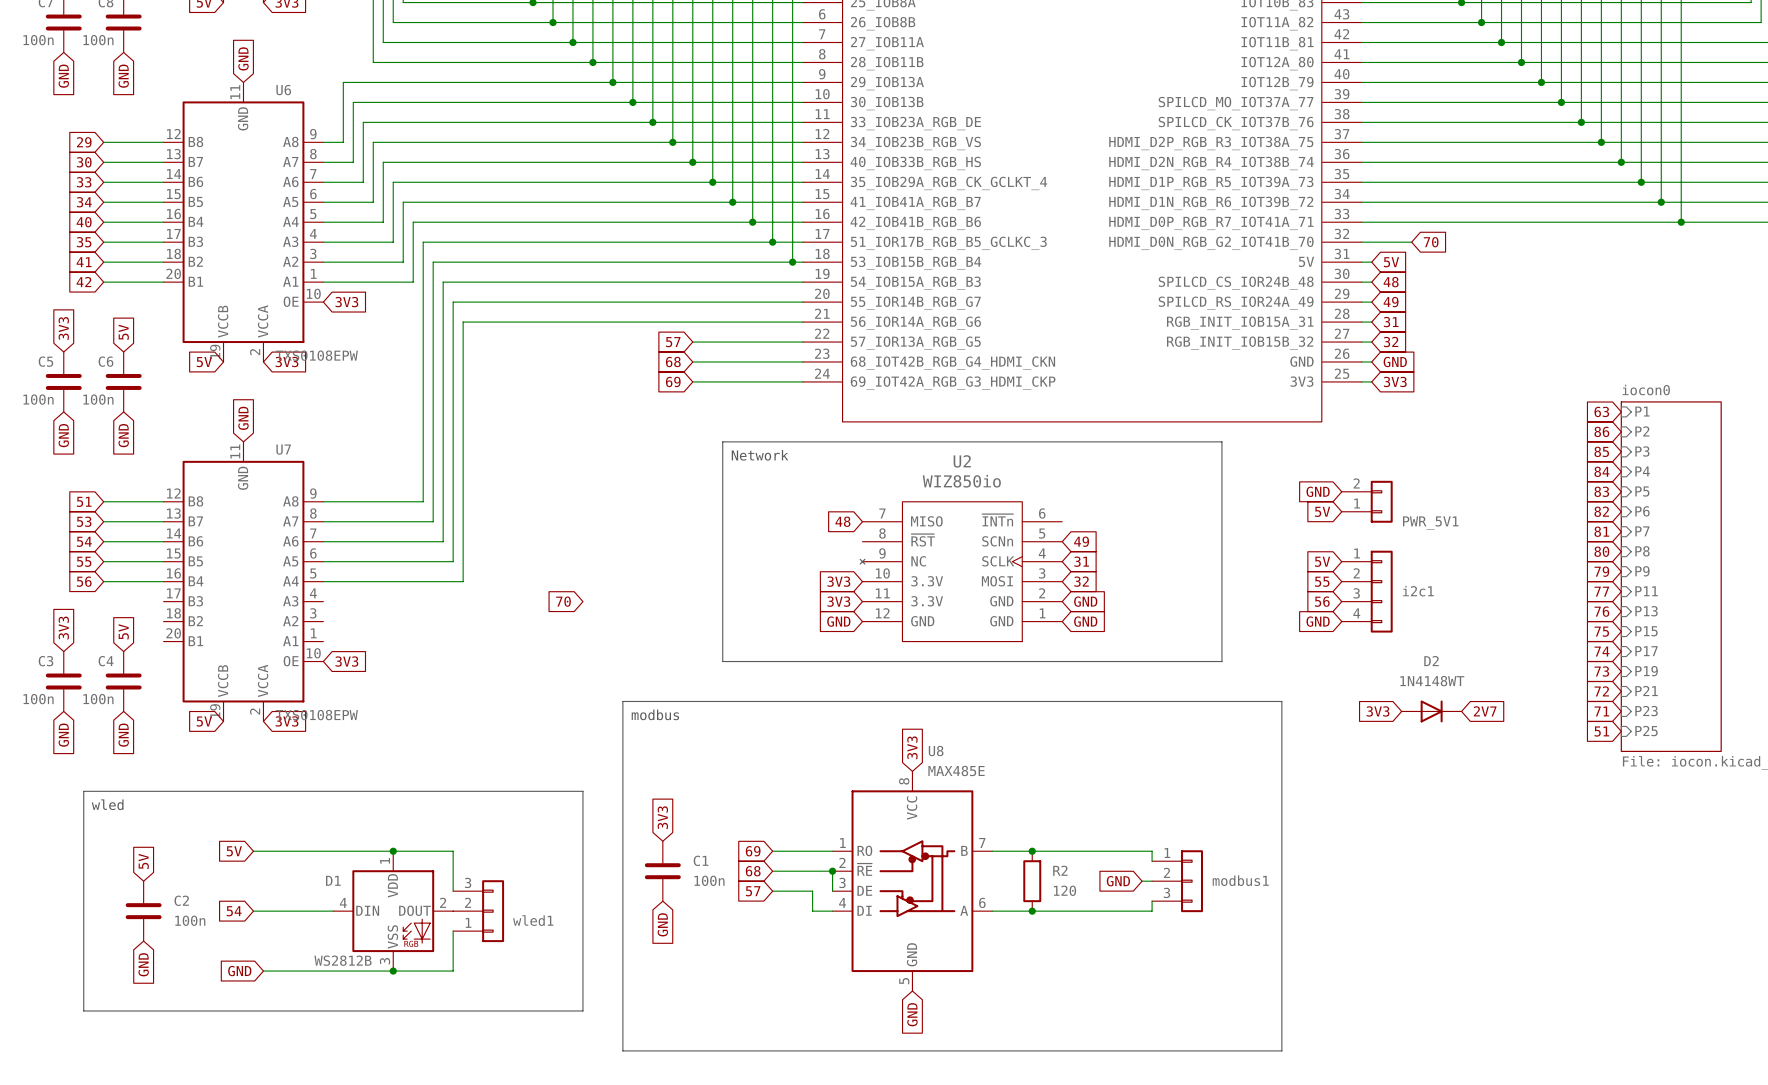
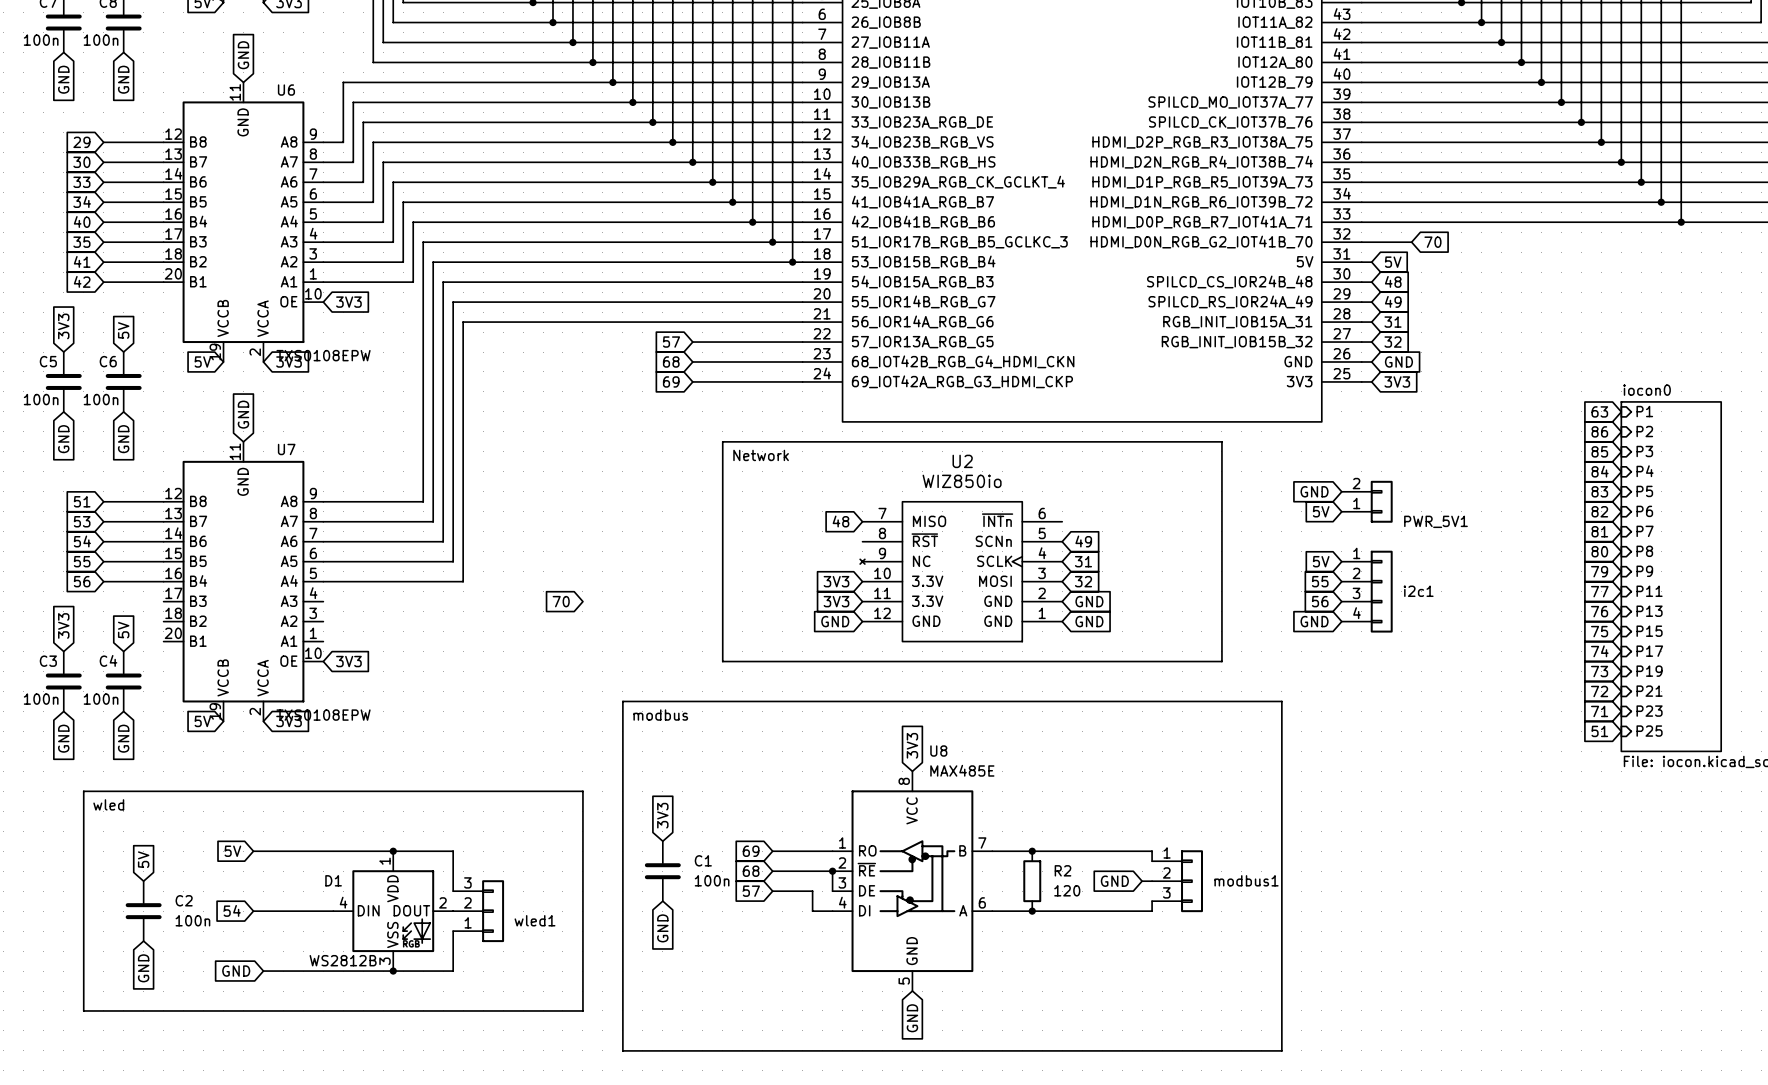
global label: 3V3 (1378, 711) -> none
D2: 1N4148WT (1431, 711) -> none
global label: 2V7 (1485, 711) -> none

